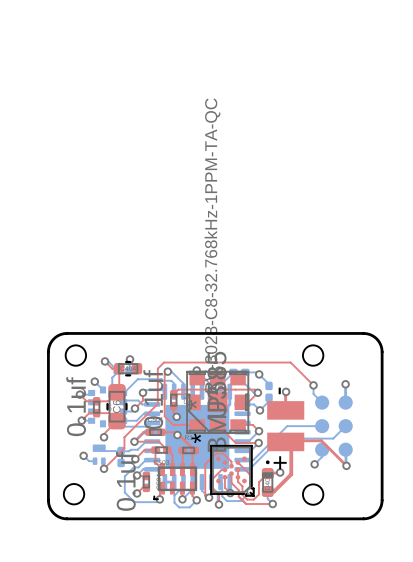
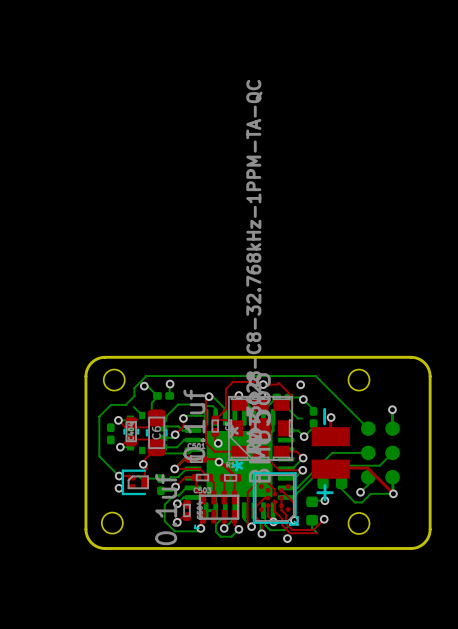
via: none -> (263, 384)
via: none -> (300, 384)
top track: (105, 361) (112, 368) (119, 368) (119, 390) (117, 392) -> none
part rotation: 0° (128, 368) -> 90° clockwise (131, 431)
part position: (128, 368) -> (131, 431)
via: (94, 381) -> none
top track: (313, 385) (290, 362) (163, 362) (157, 368) (157, 403) (124, 437) (124, 448) (104, 468) -> none
bottom track: (313, 385) (313, 393) -> (119, 476) (99, 456) (99, 416) (111, 404) (125, 404) (134, 396) (134, 387) (146, 376) (315, 376) (359, 419)
via: (313, 385) -> none
top track: (178, 389) (254, 389) (257, 392) (248, 402) (240, 402) -> (220, 415) (225, 409) (225, 389) (232, 381) (263, 381) (263, 384) (276, 384) (278, 382) (292, 396) (292, 419) (283, 428)
via: (257, 392) -> none
part side: top (96, 407) -> bottom (110, 433)
top track: none -> (147, 468) (145, 470) (145, 482)
top track: (285, 441) (291, 447) (291, 474) (274, 491) (267, 491) -> none
top track: none -> (119, 476) (129, 476) (131, 478)
via: none -> (119, 476)
part side: bottom (99, 454) -> top (135, 482)
bottom track: (83, 455) (89, 461) (95, 461) -> none
via: (83, 455) -> none
bottom track: none -> (341, 482) (341, 489) (355, 502) (362, 502) (370, 493) (393, 493)
via: none -> (119, 488)
via: (104, 468) -> none
top track: (280, 472) (267, 473) (258, 482) (258, 494) (253, 499) (247, 499) -> (324, 519) (313, 529) (290, 528)
part side: top (267, 478) -> bottom (332, 482)
via: none -> (324, 519)
via: (272, 504) -> none
via: none -> (287, 538)

